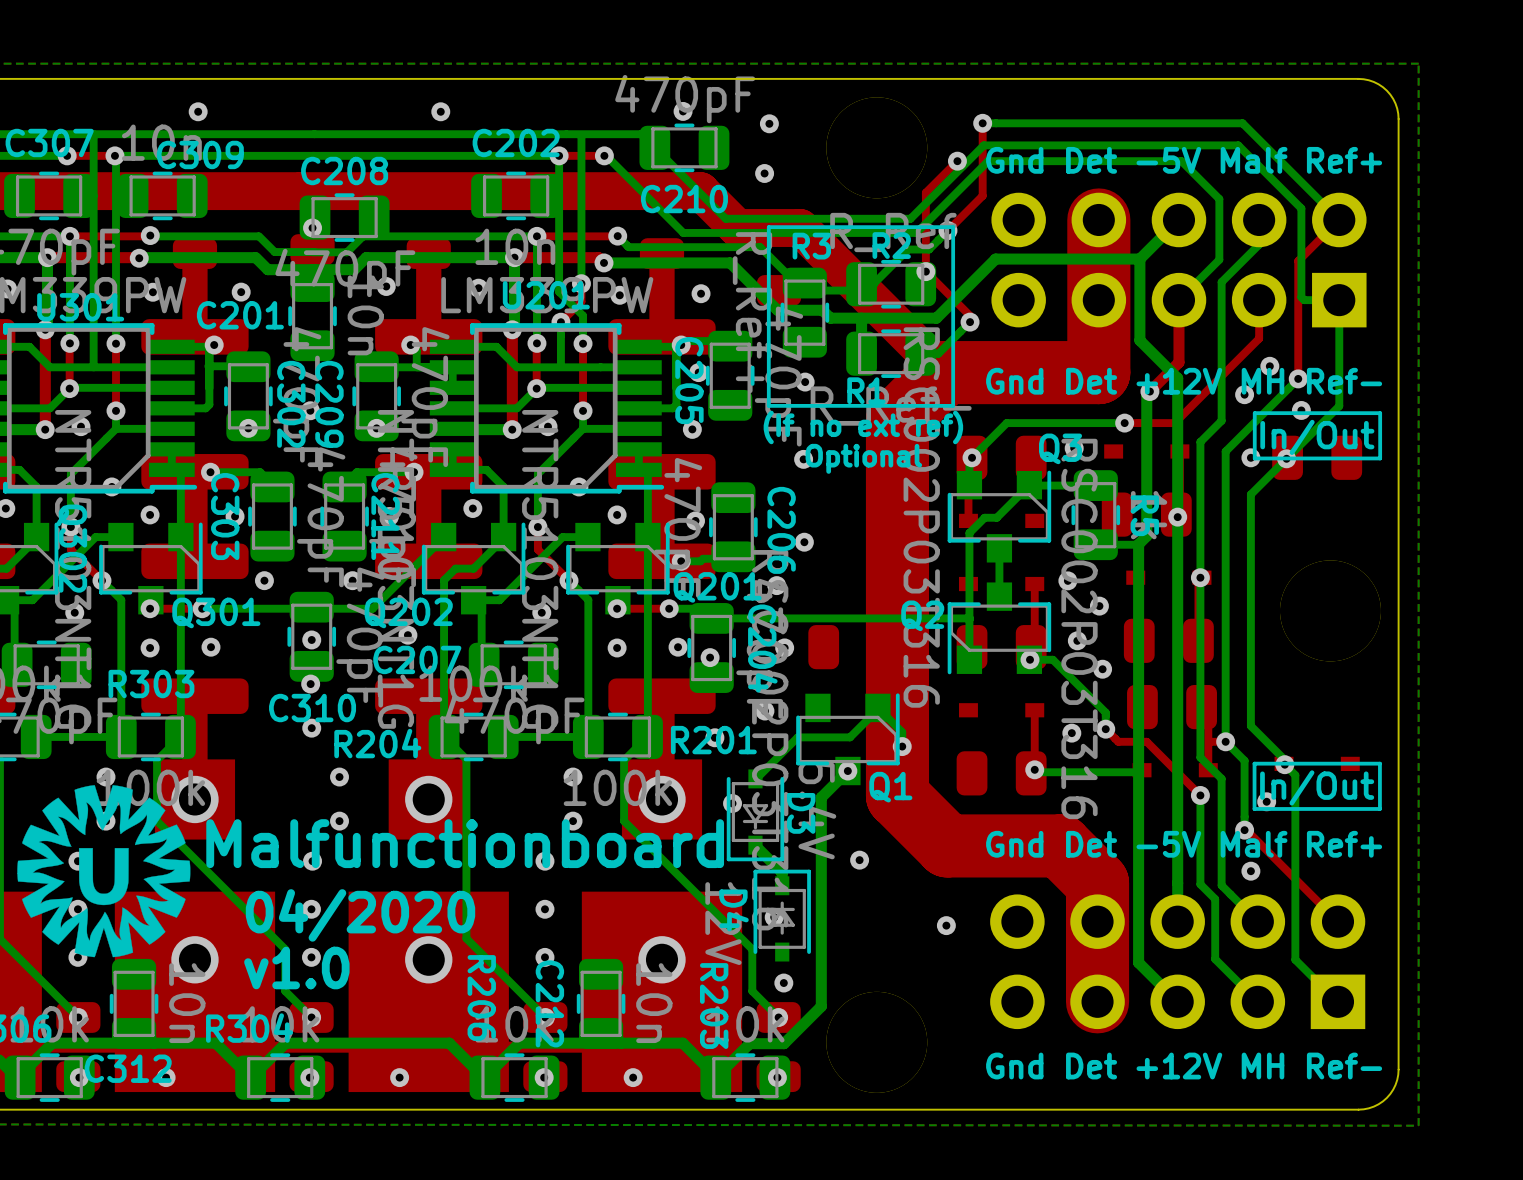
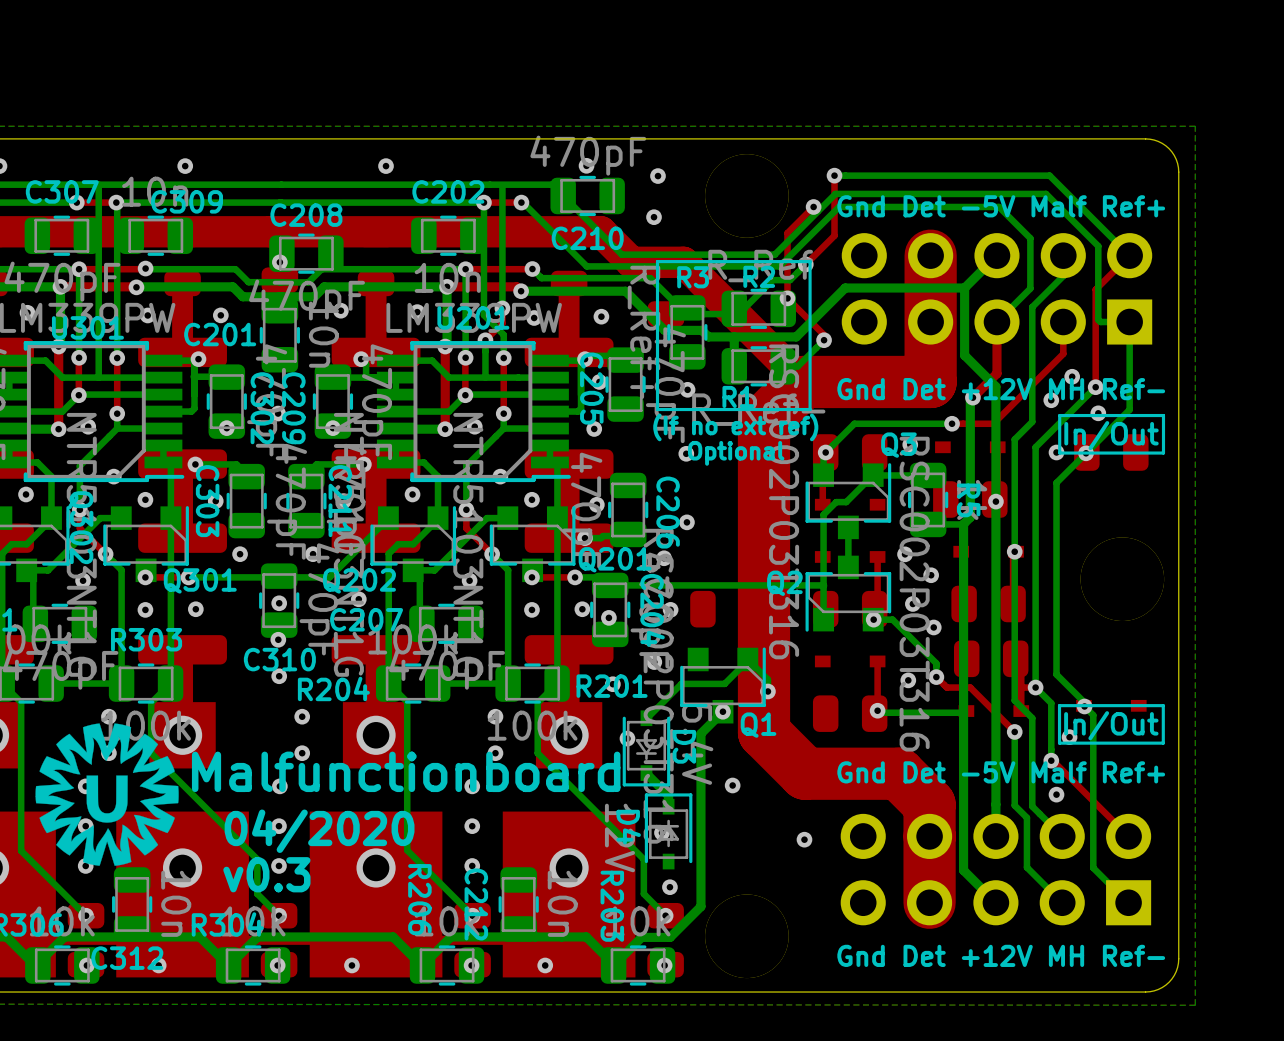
text: v1.0 (296, 967) -> v0.3 (266, 874)

